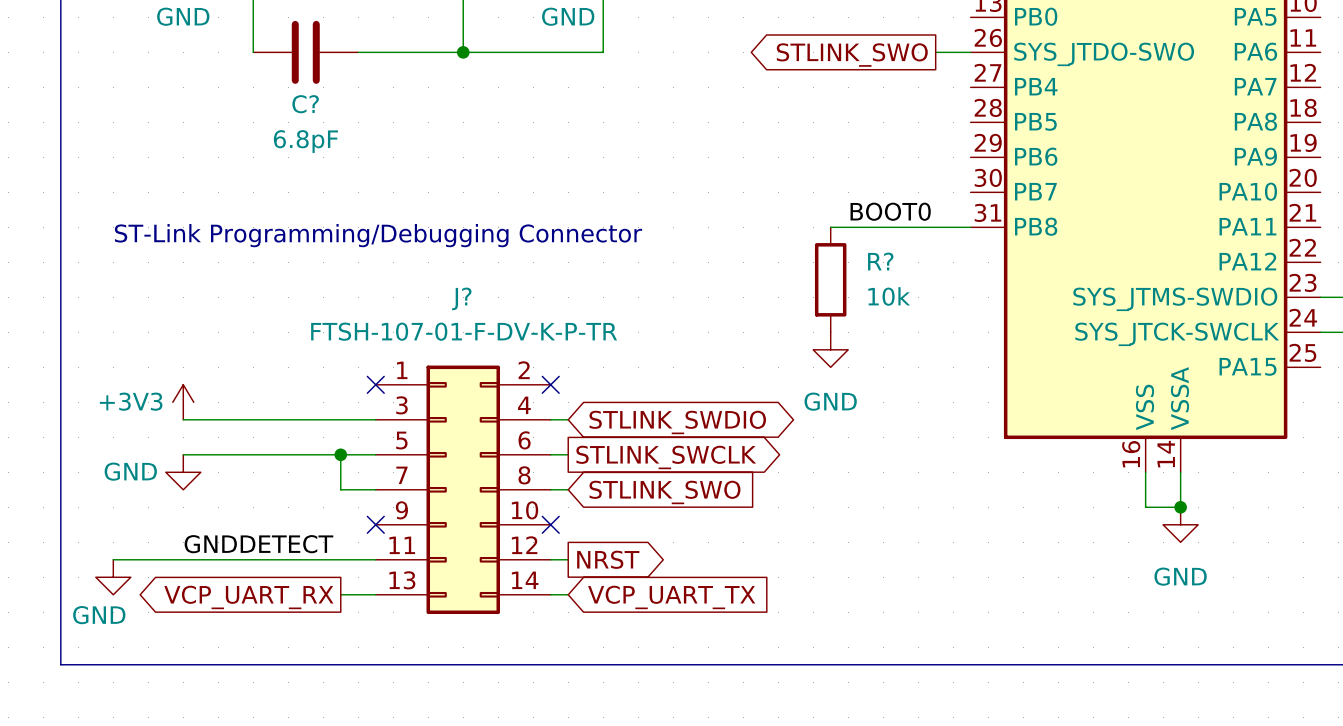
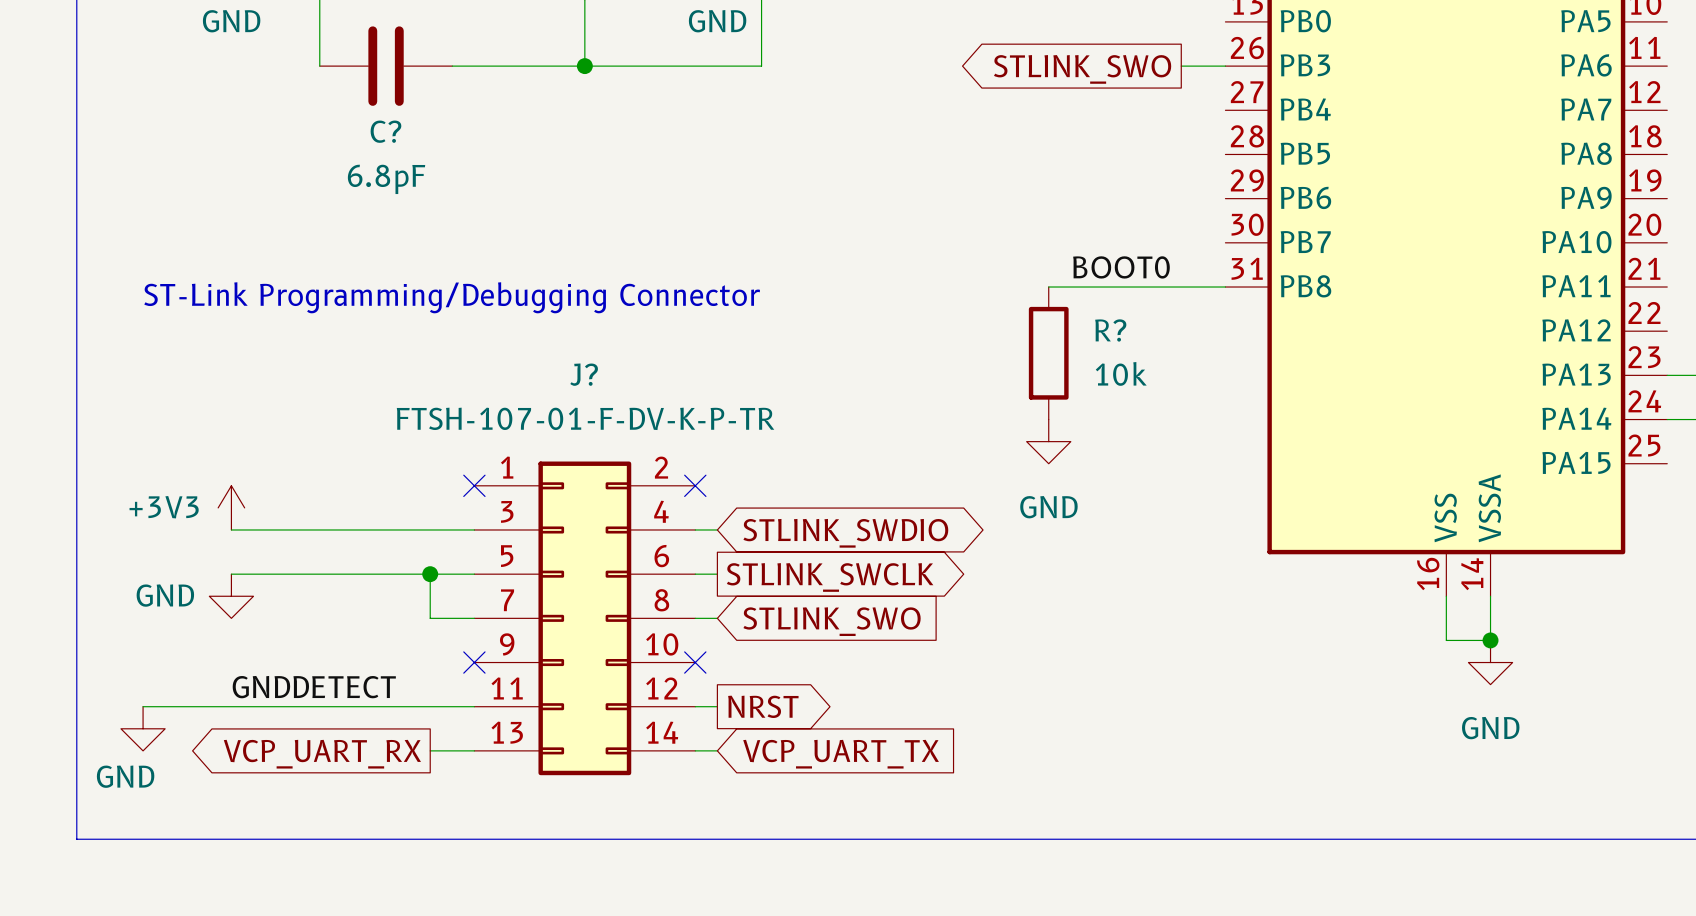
part pin name: SYS_JTDO-SWO (1104, 54) -> PB3 (1305, 65)
part pin name: SYS_JTMS-SWDIO (1175, 299) -> PA13 (1576, 374)
part pin name: SYS_JTCK-SWCLK (1177, 334) -> PA14 (1576, 418)

